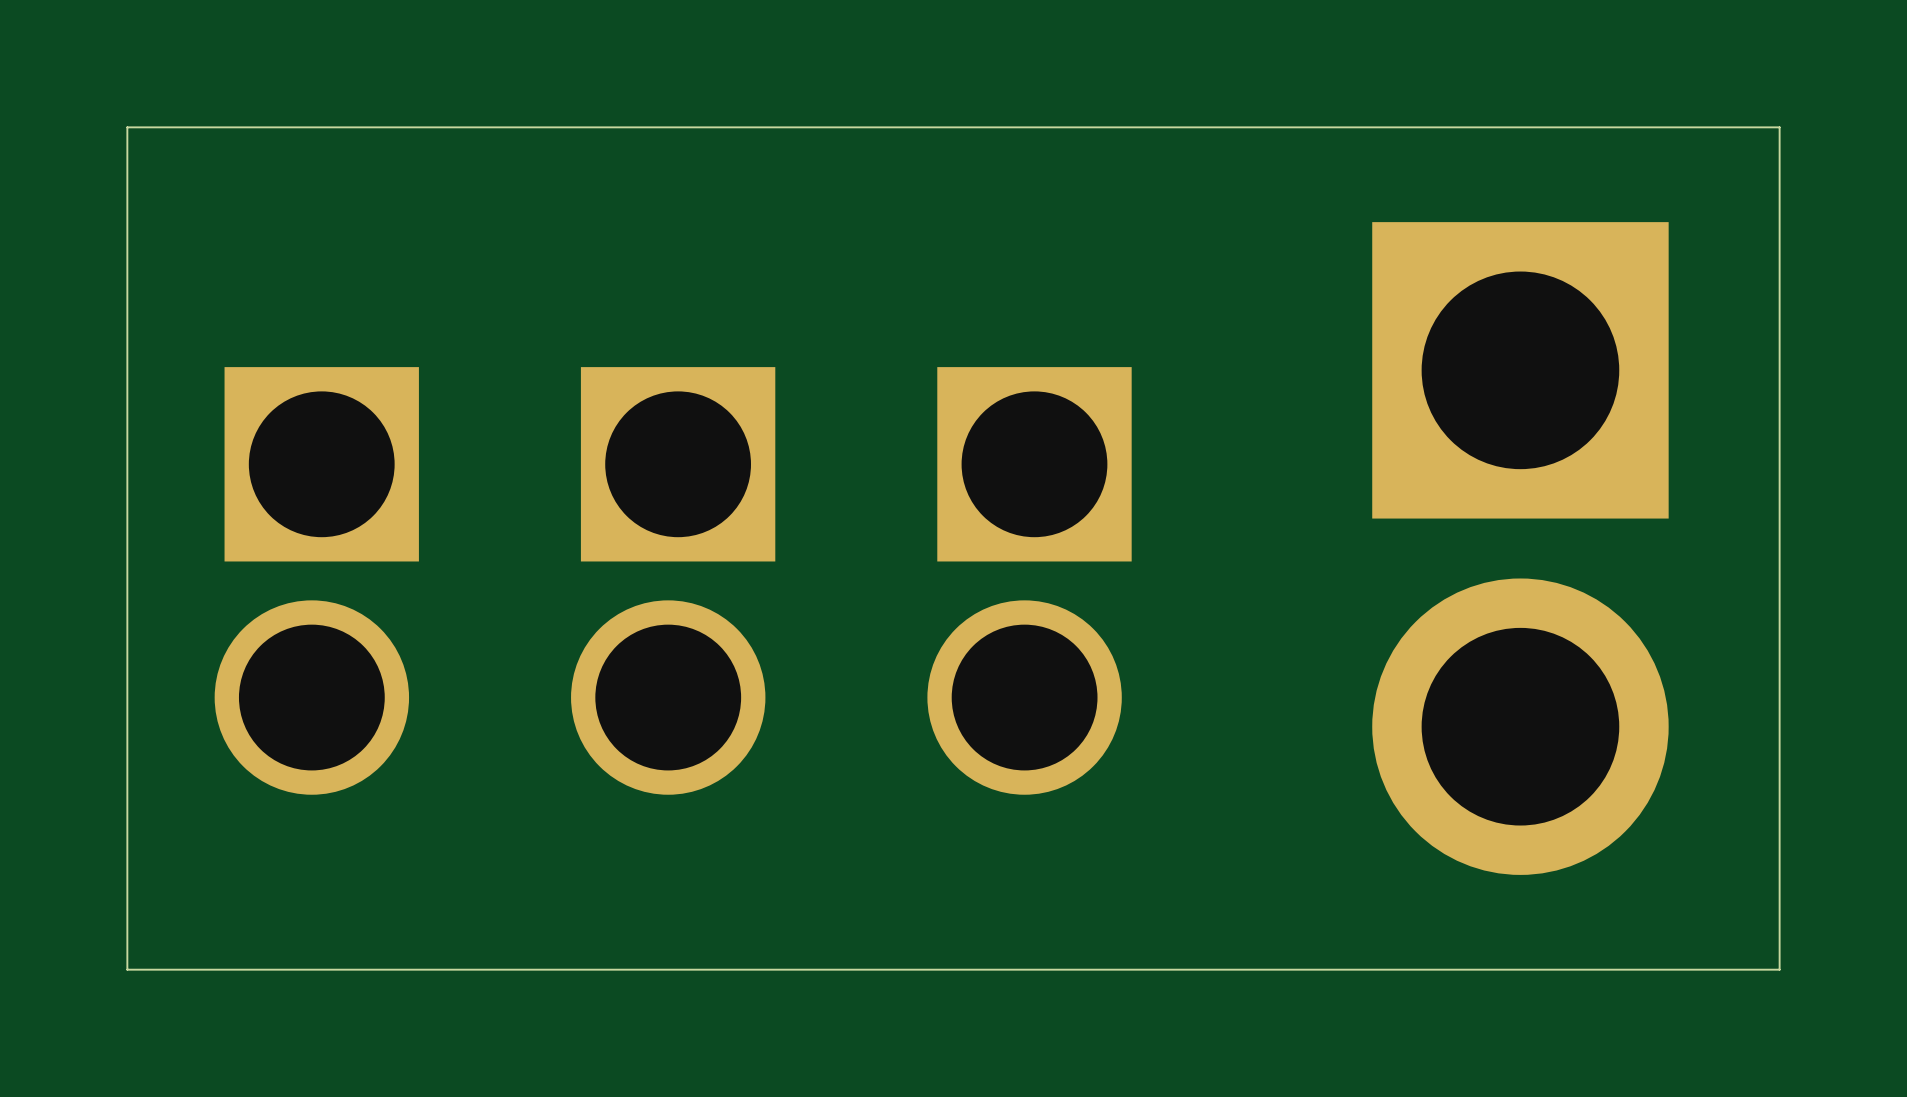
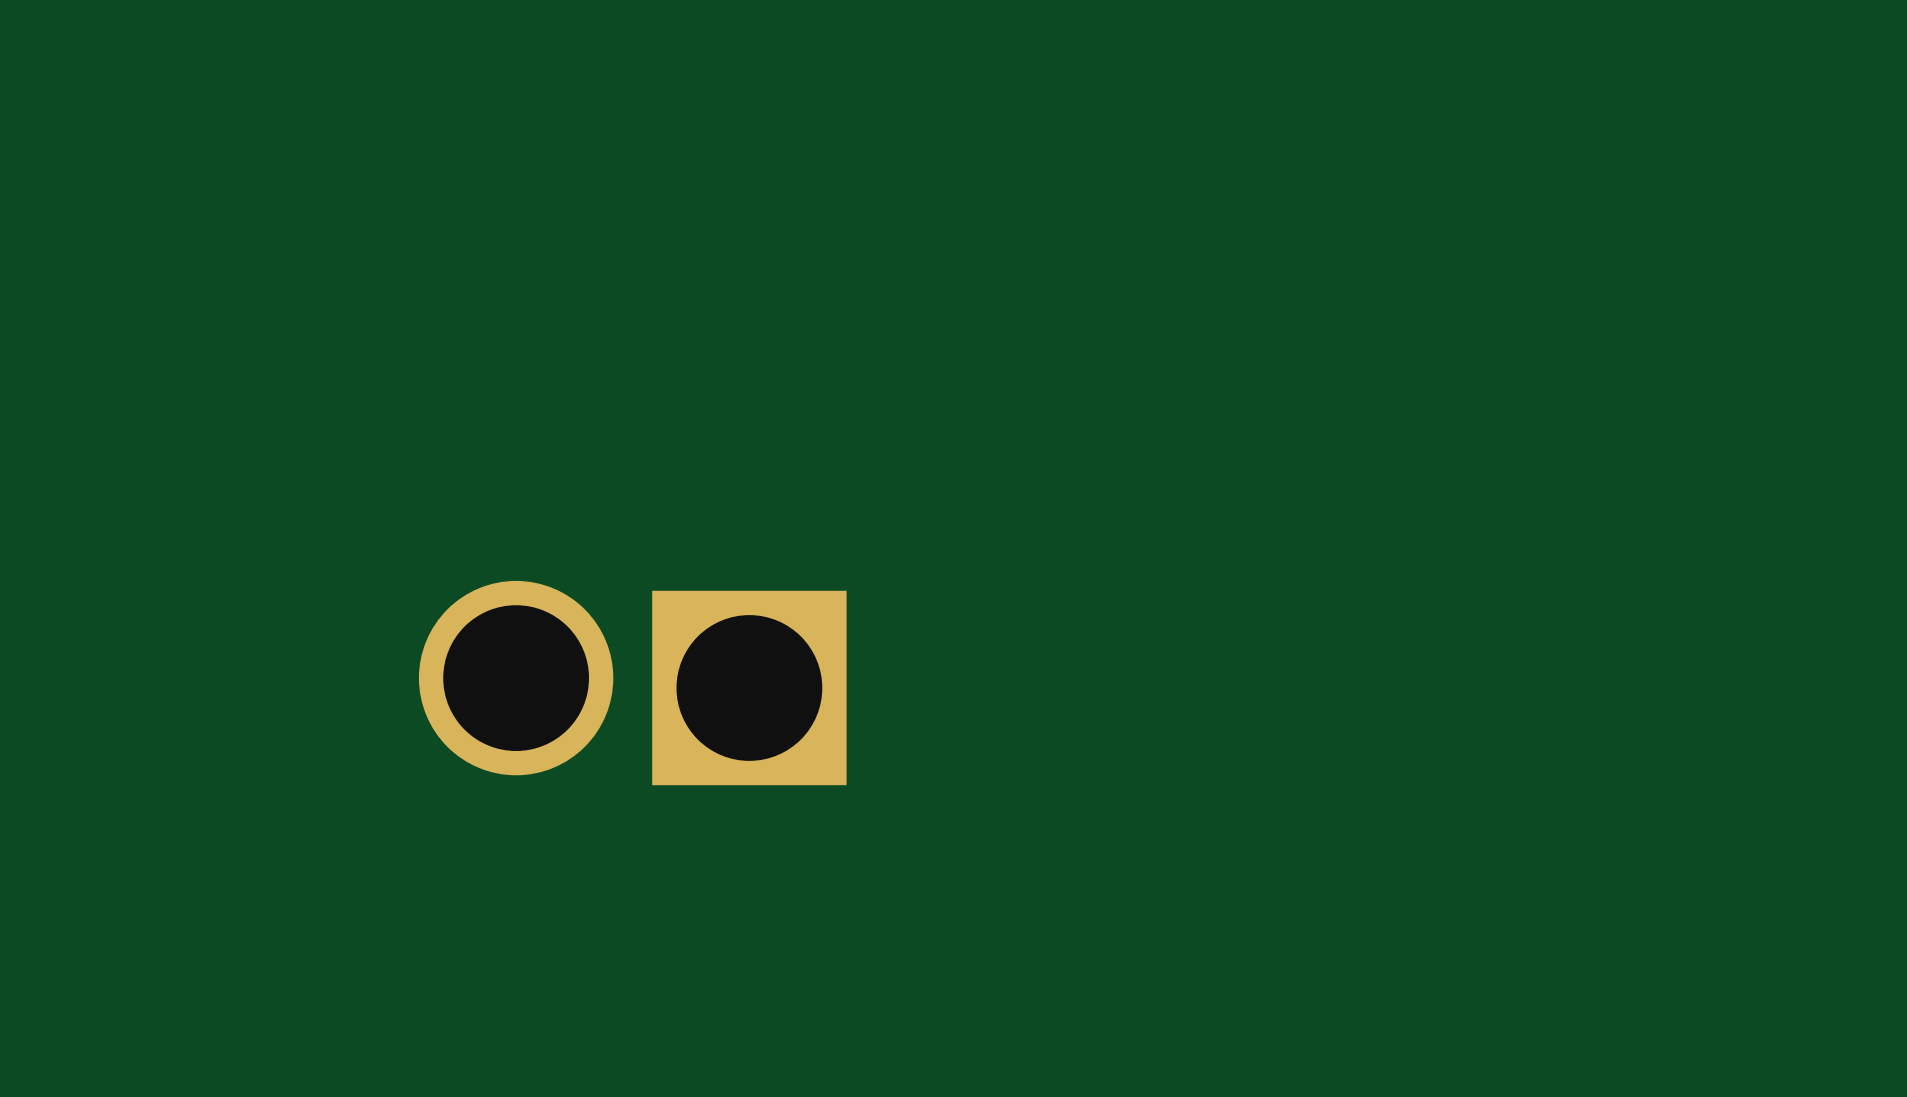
board edge: (1779, 127) (127, 127) (127, 969) (1779, 969) (1779, 127) -> none
part: (1520, 548) -> none
part: (316, 580) -> none
part rotation: 0° (673, 580) -> 90° clockwise (632, 683)
part: (1029, 580) -> none

